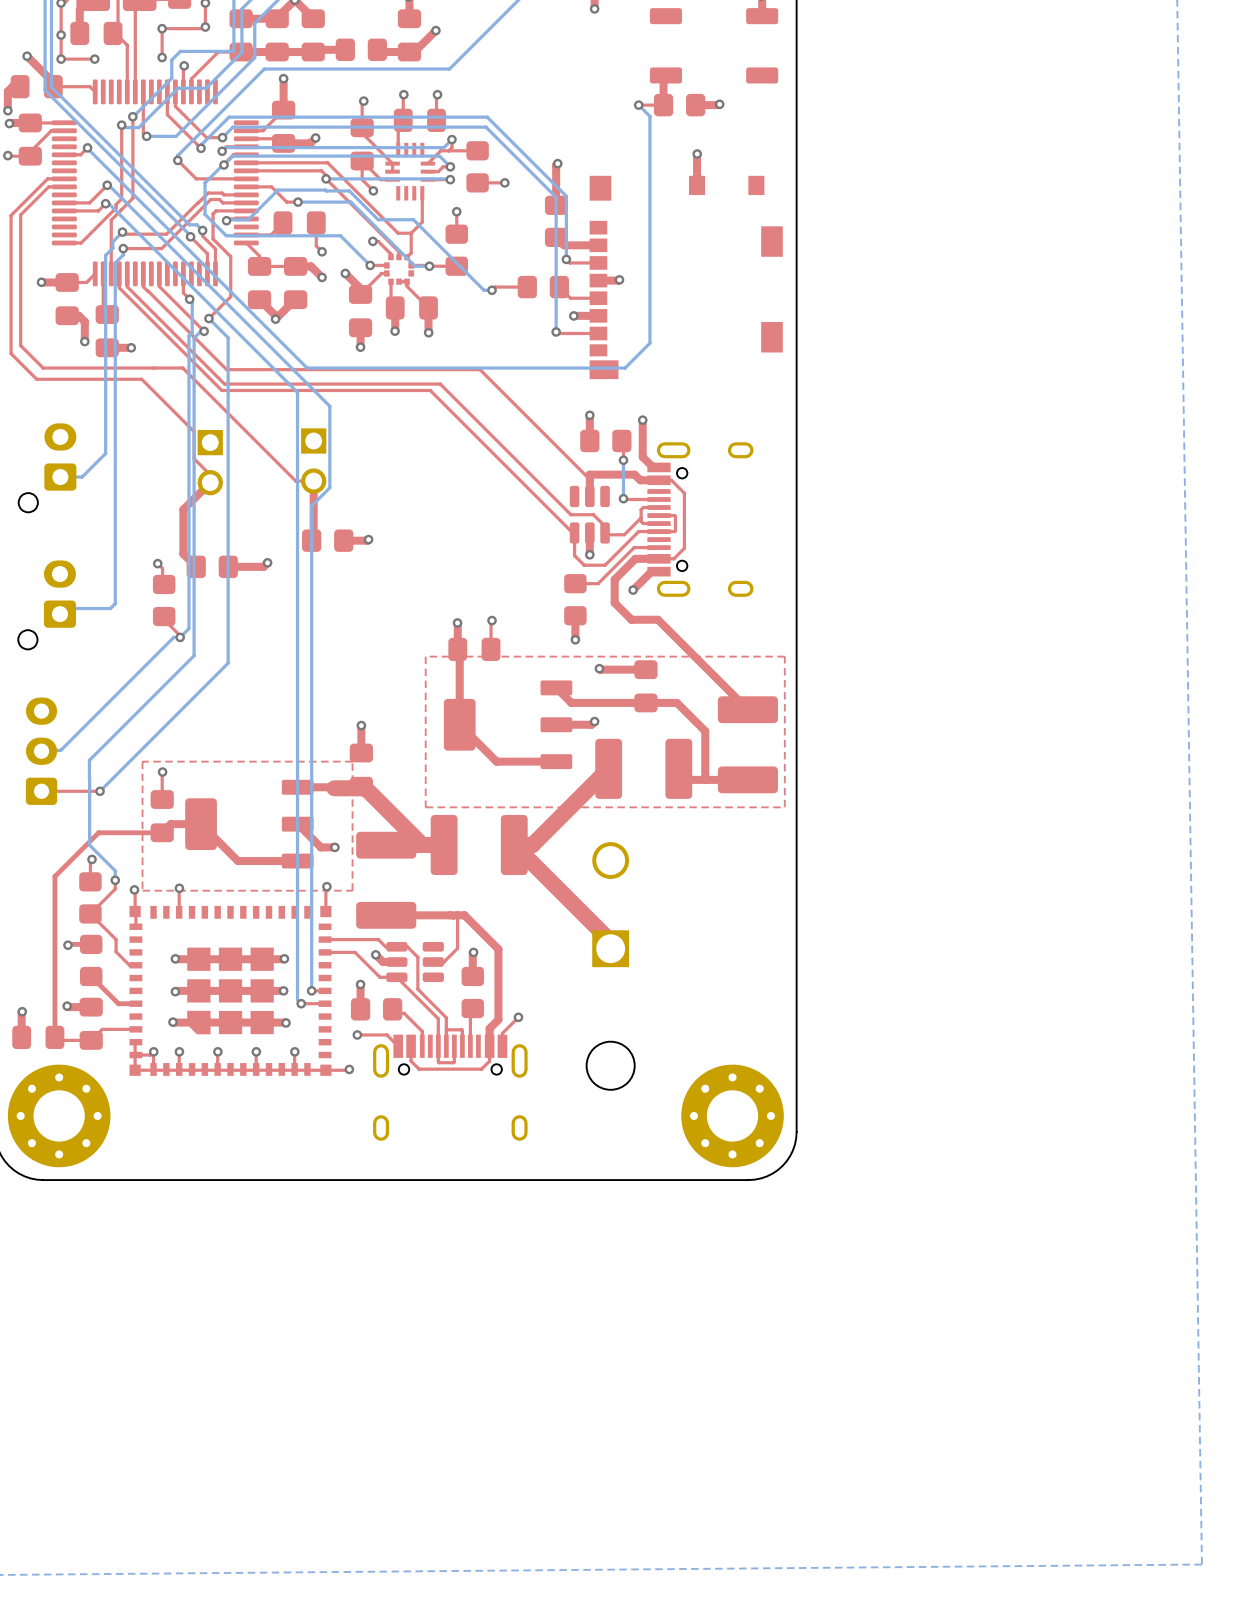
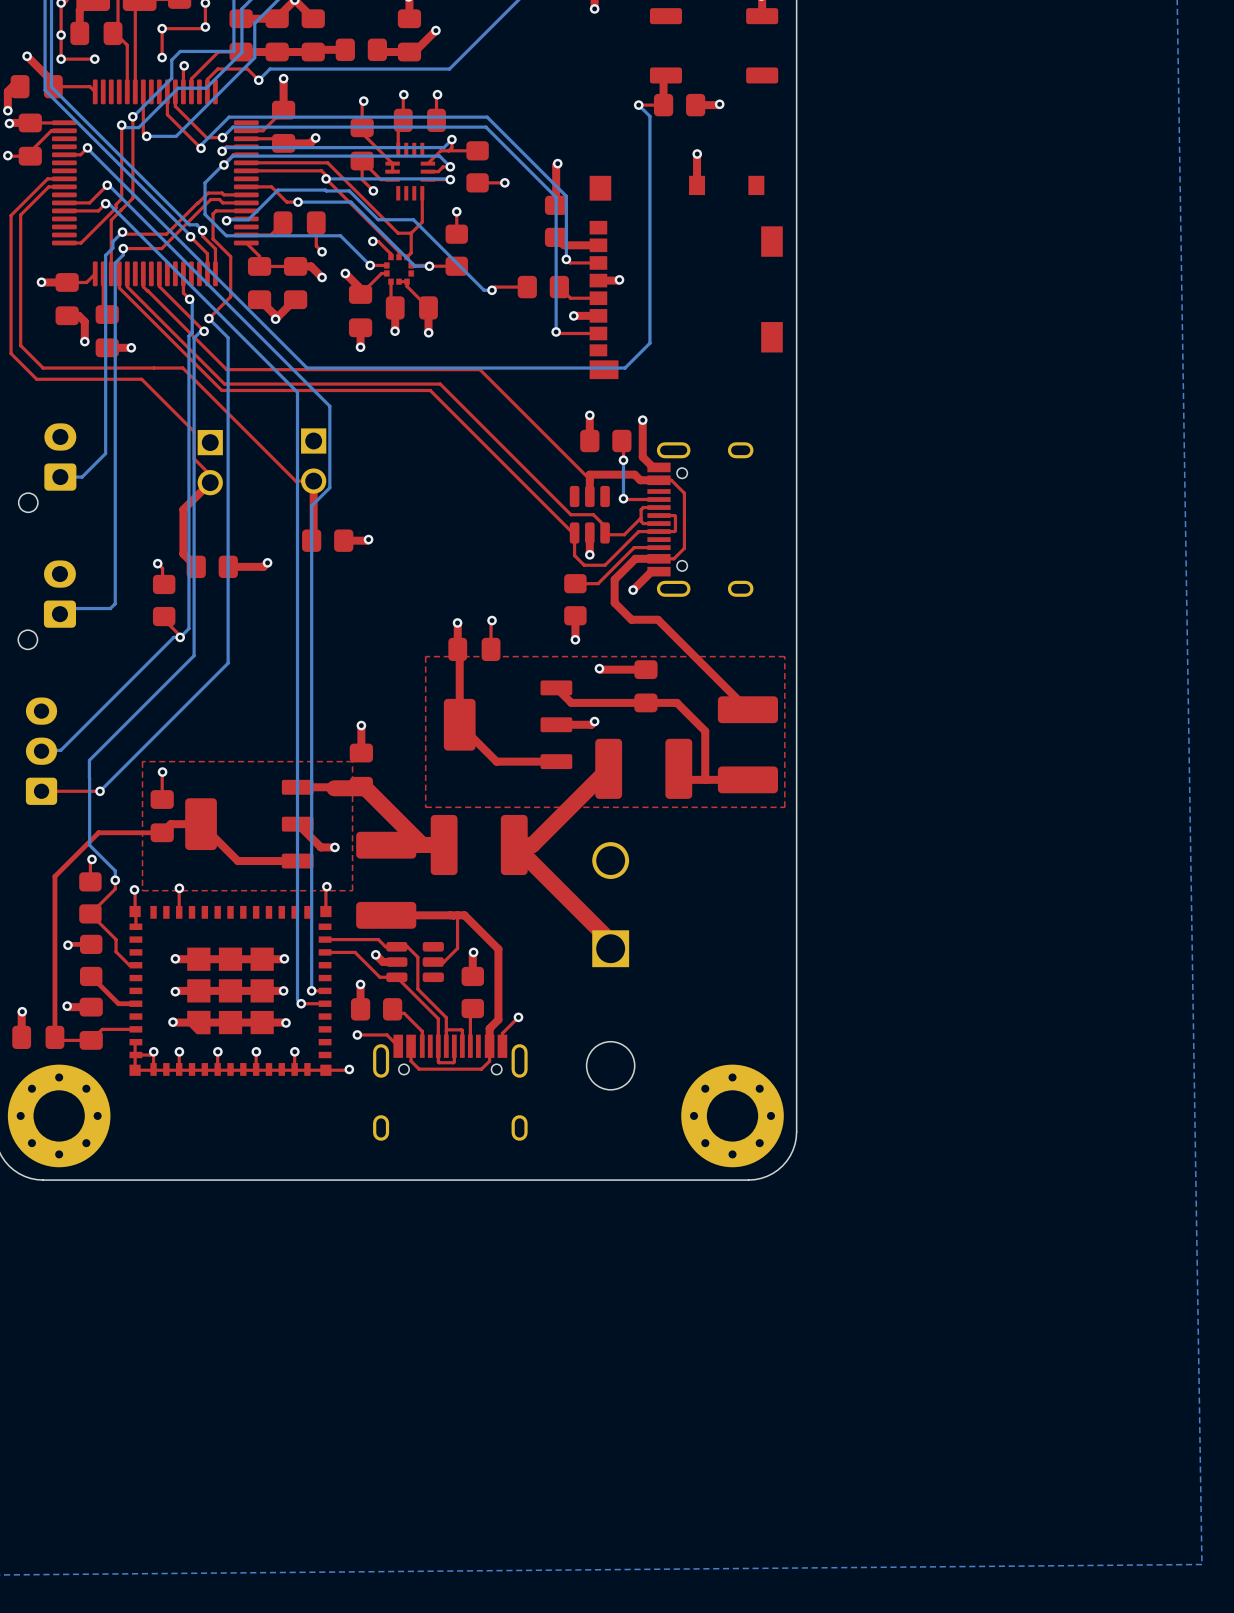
bottom track: (270, 69) (264, 69) (177, 155) (177, 160) -> (270, 69) (258, 80)
top track: none -> (258, 80) (247, 69) (217, 69) (207, 79) (207, 91)
via: none -> (258, 80)
top track: (177, 160) (196, 178) (246, 178) -> none
via: (177, 160) -> none

